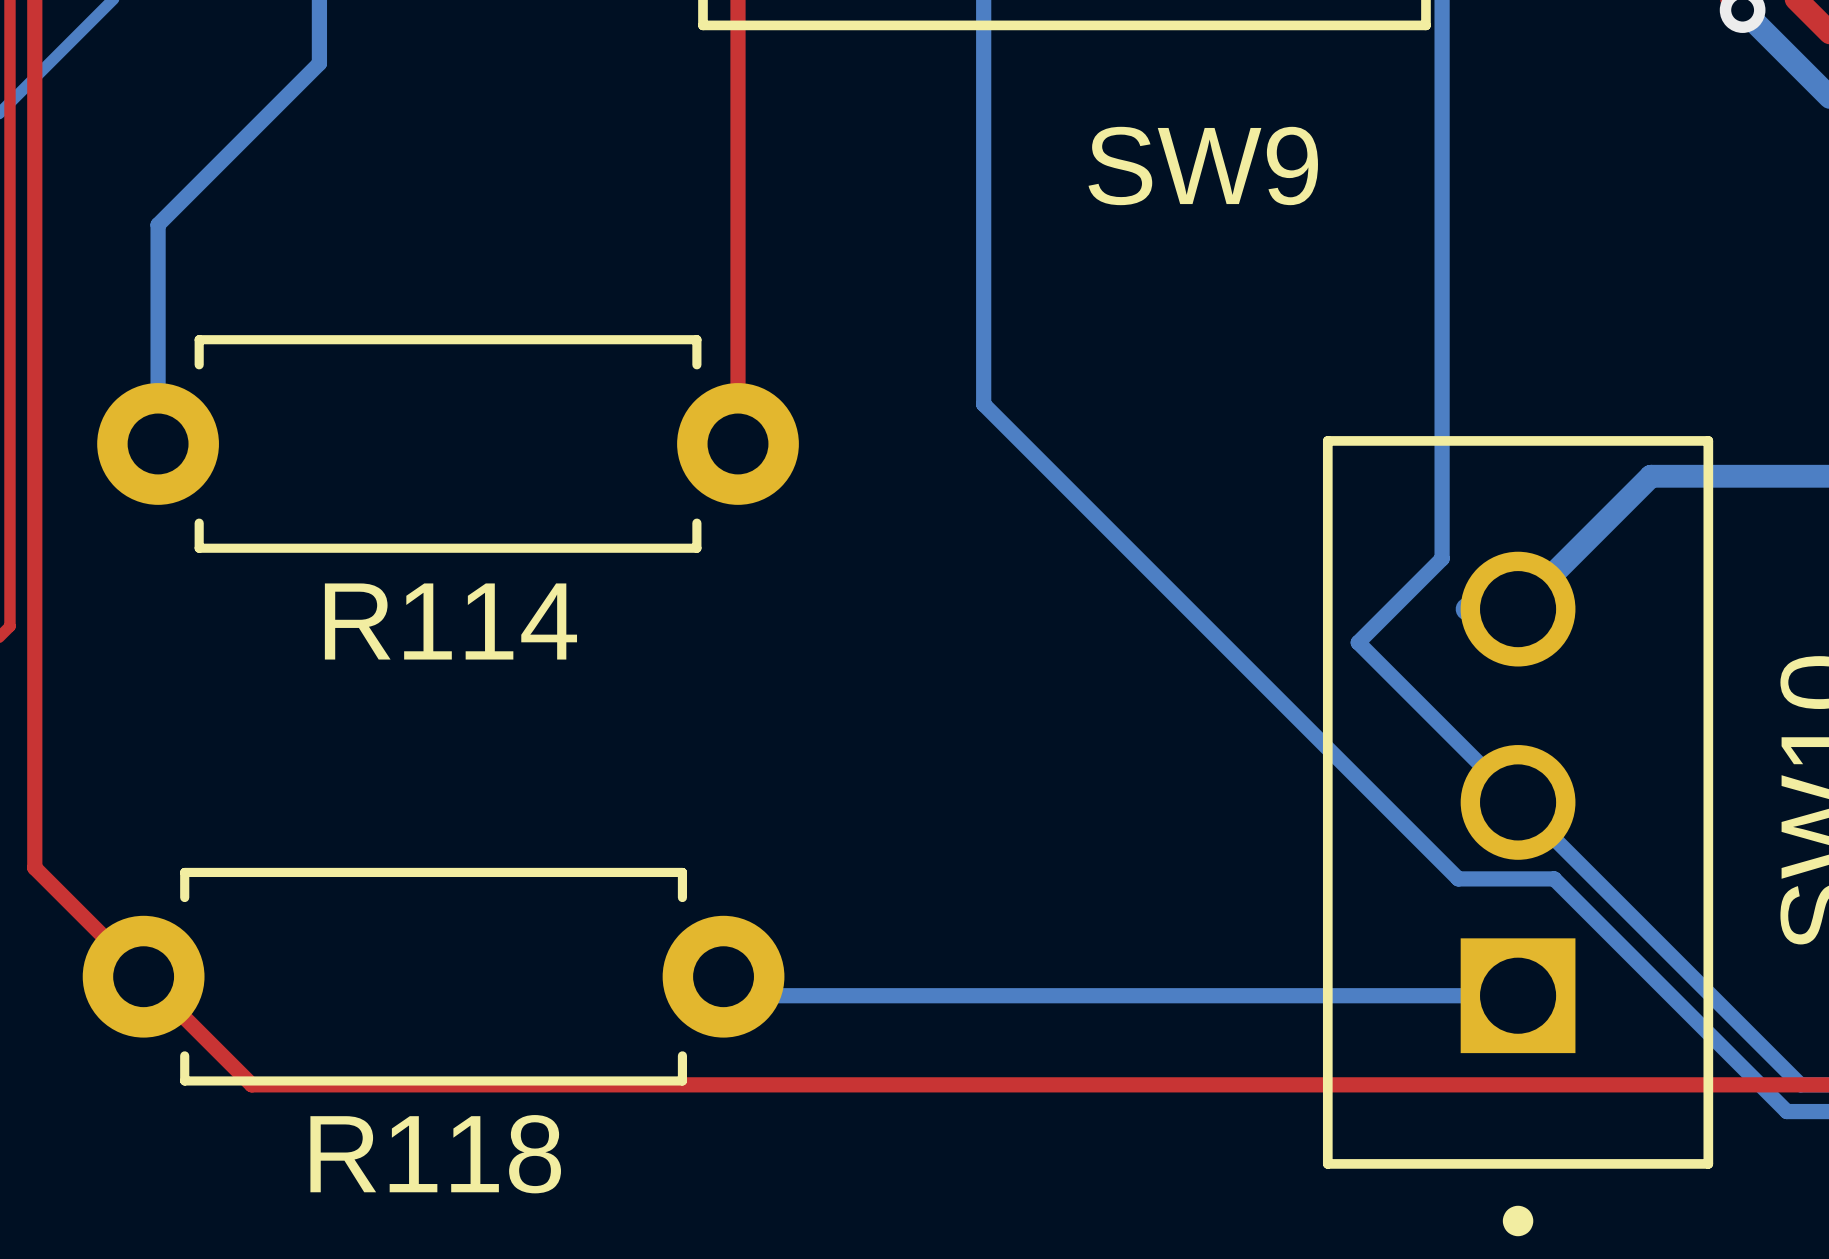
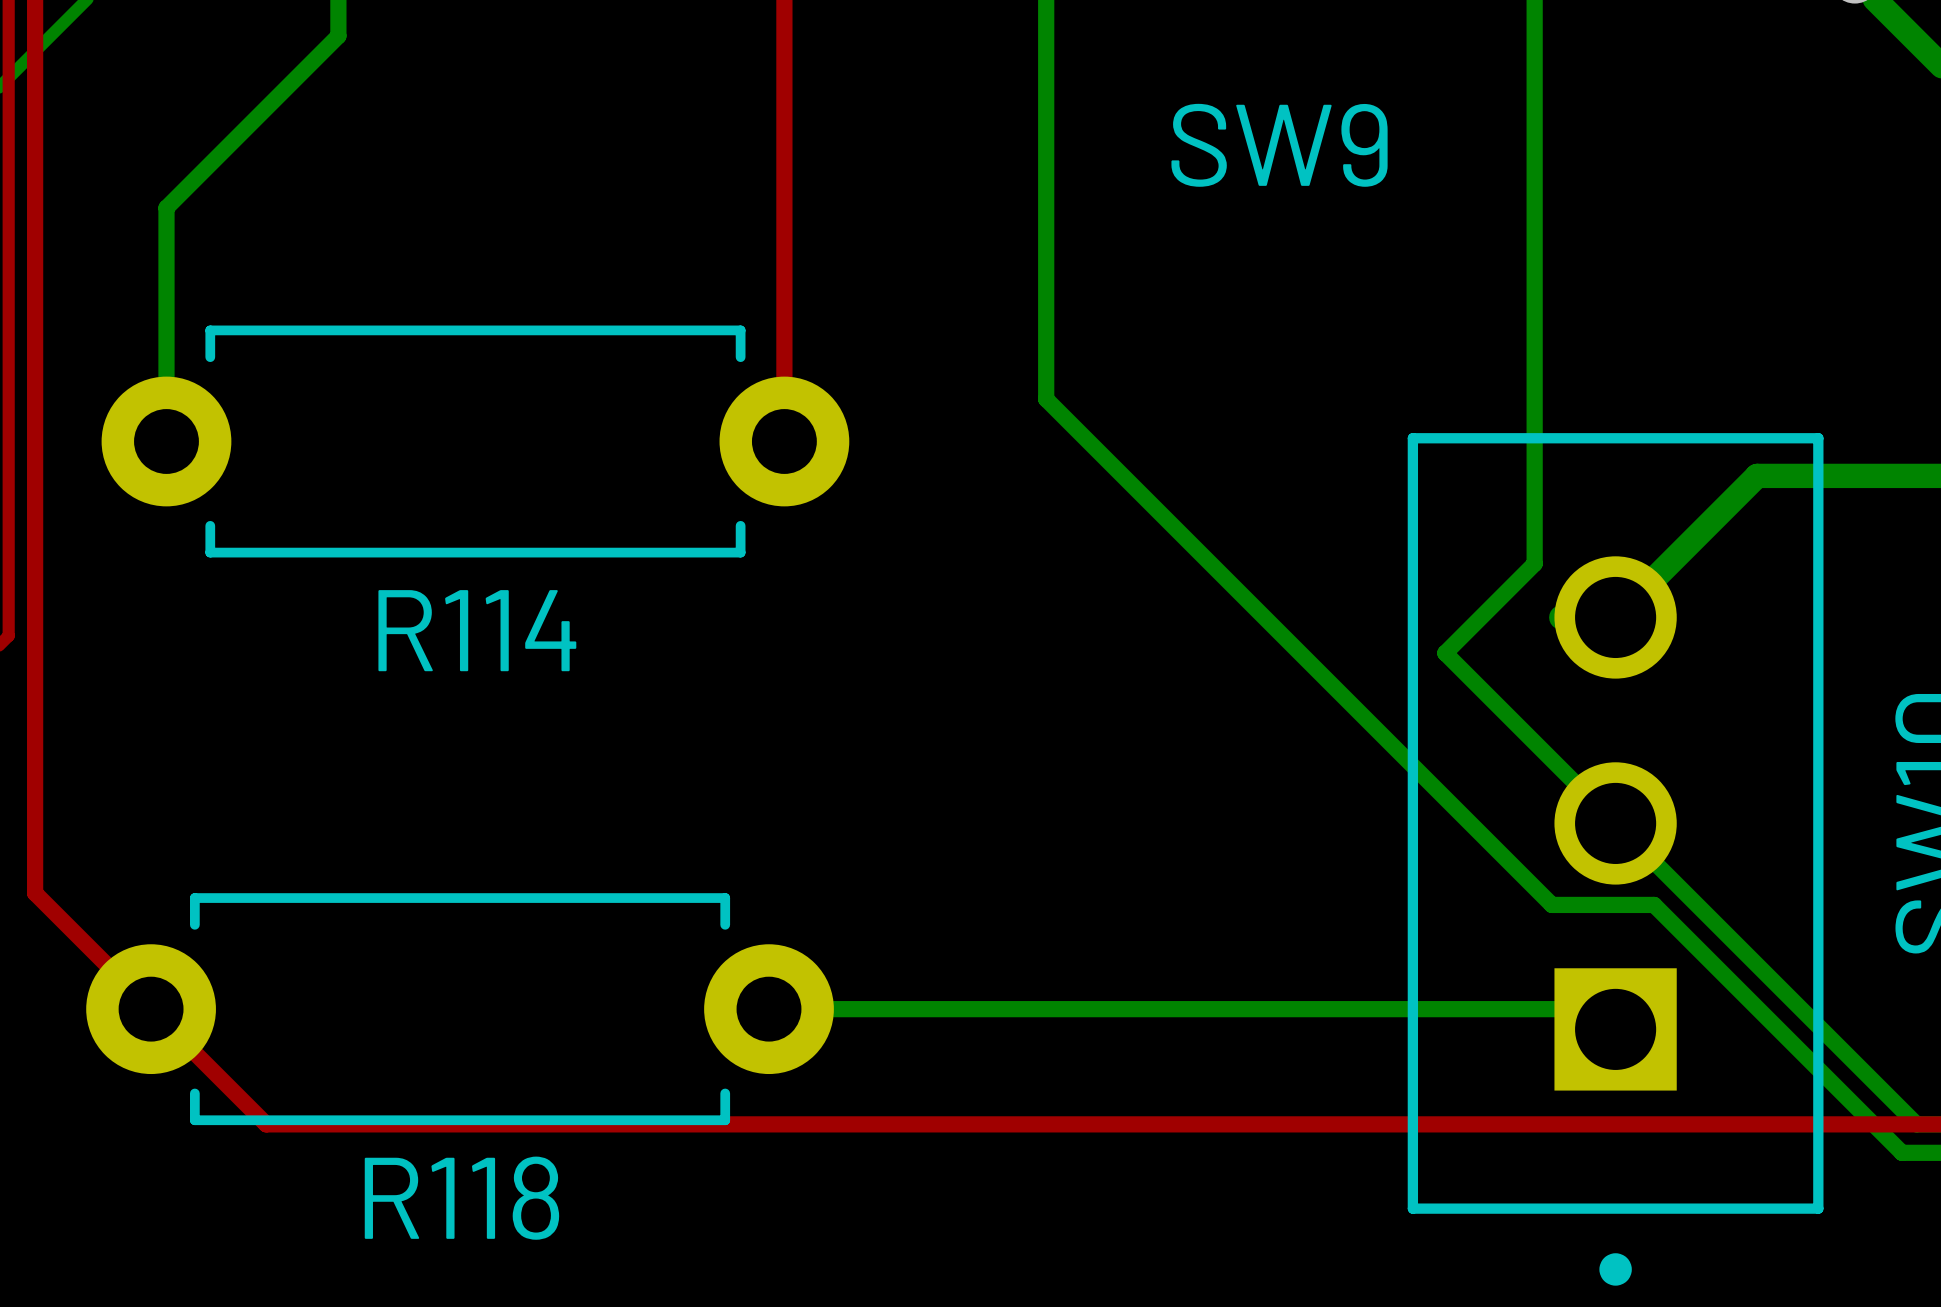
bottom track: (723, 976) (742, 995) (1499, 995) -> (769, 1009) (1575, 1009) (1595, 1029)

